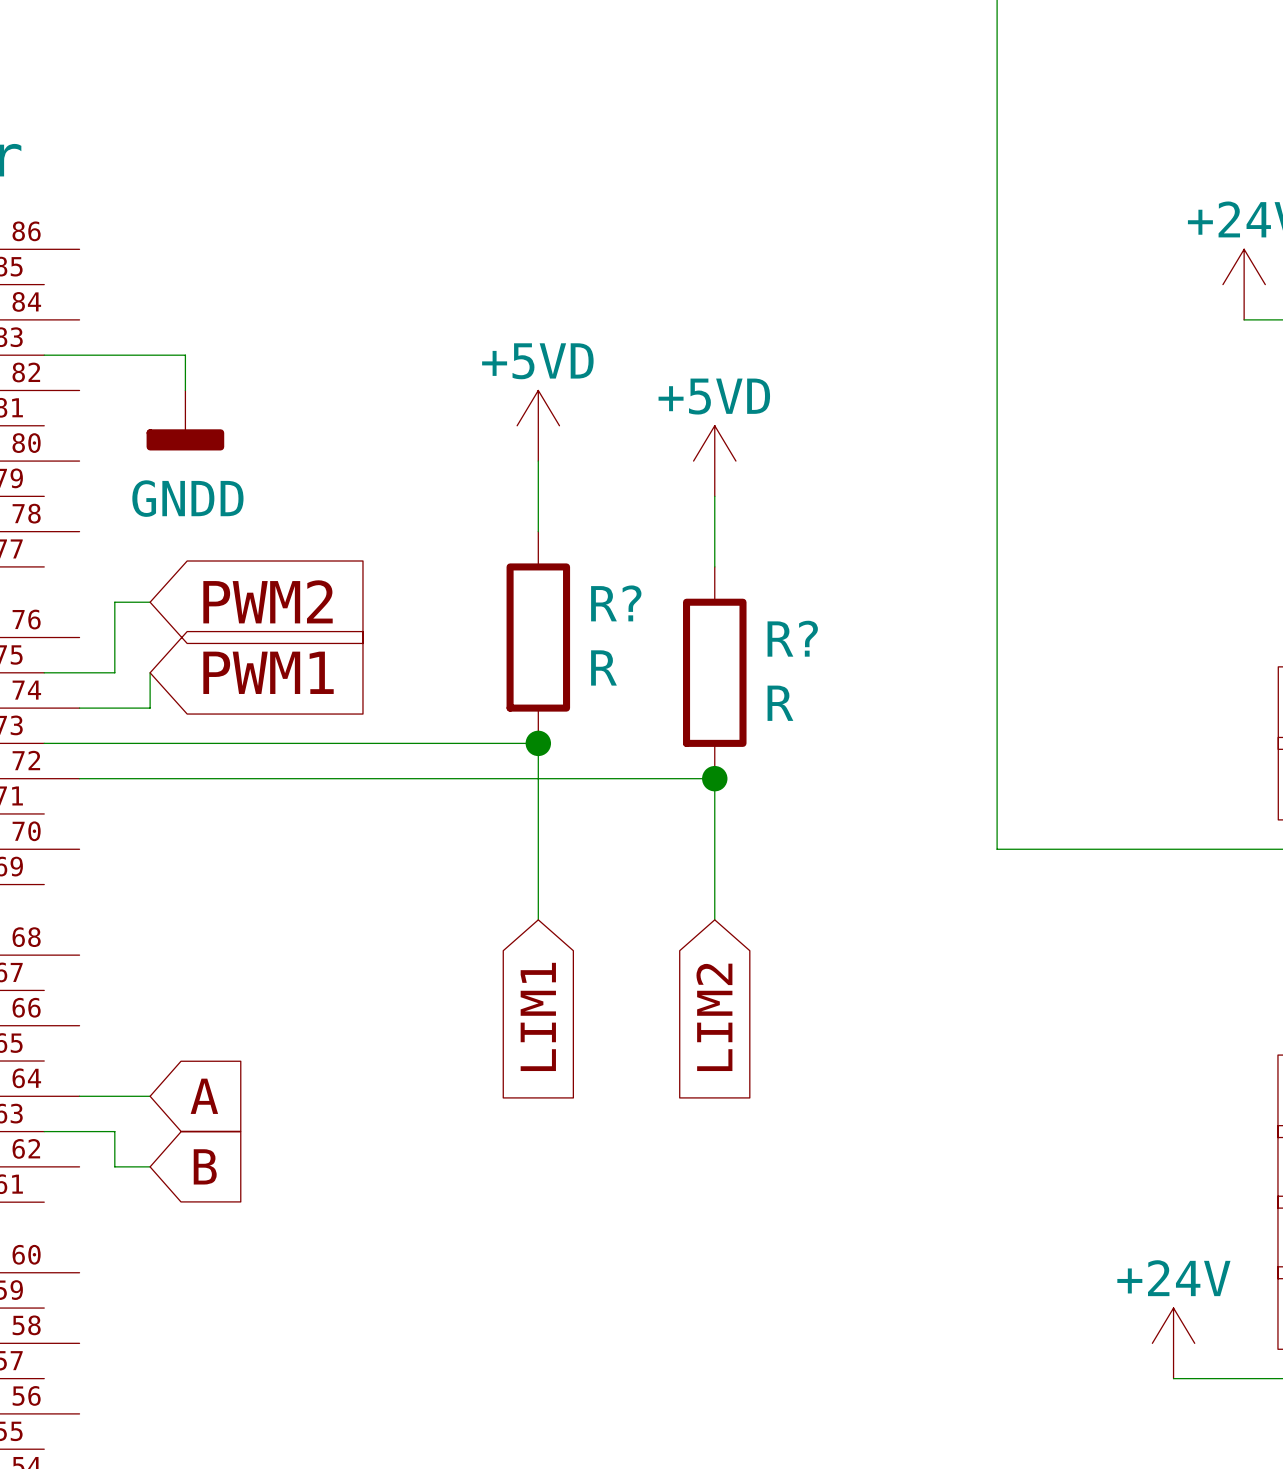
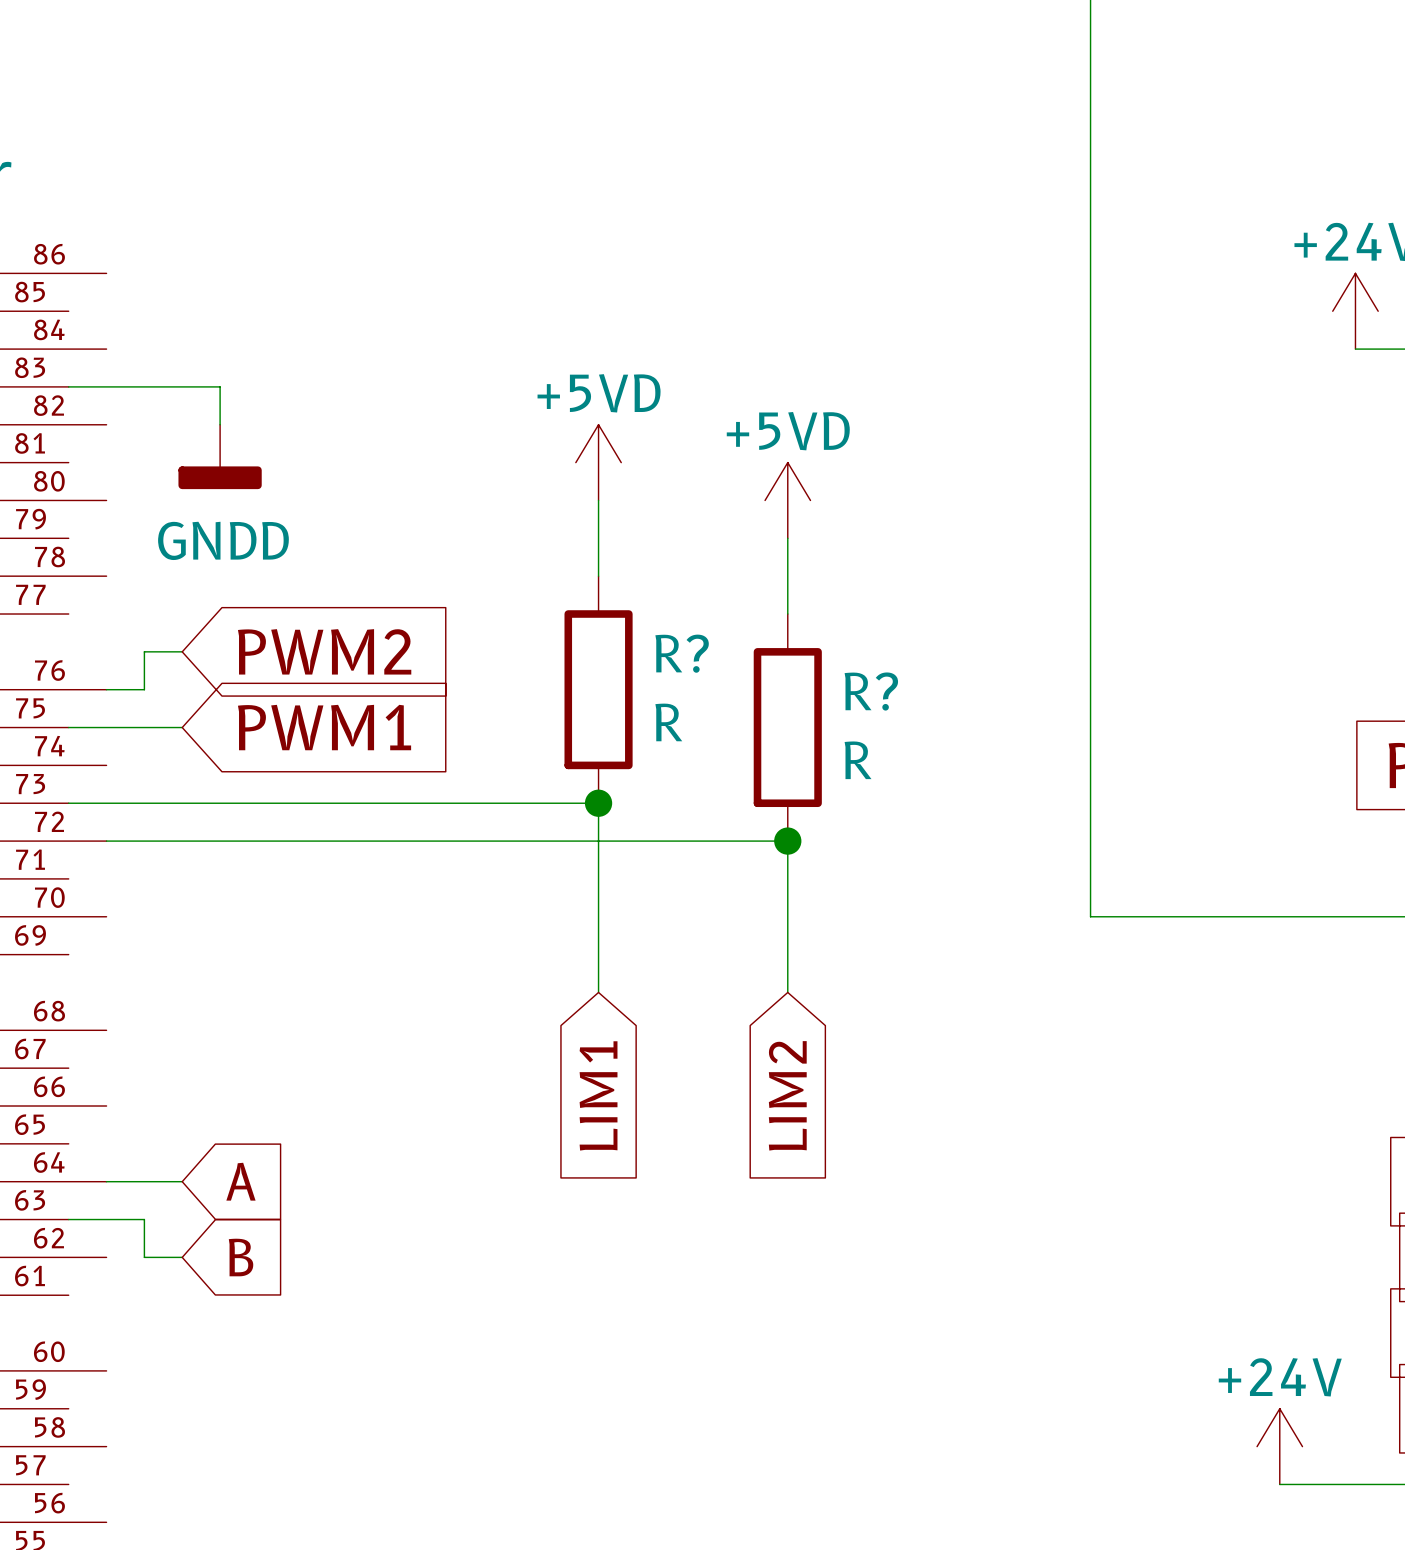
wire: (114, 637) (114, 672) -> (144, 689) (106, 689)
wire: (150, 672) (150, 708) (79, 708) -> (182, 727) (144, 727)

